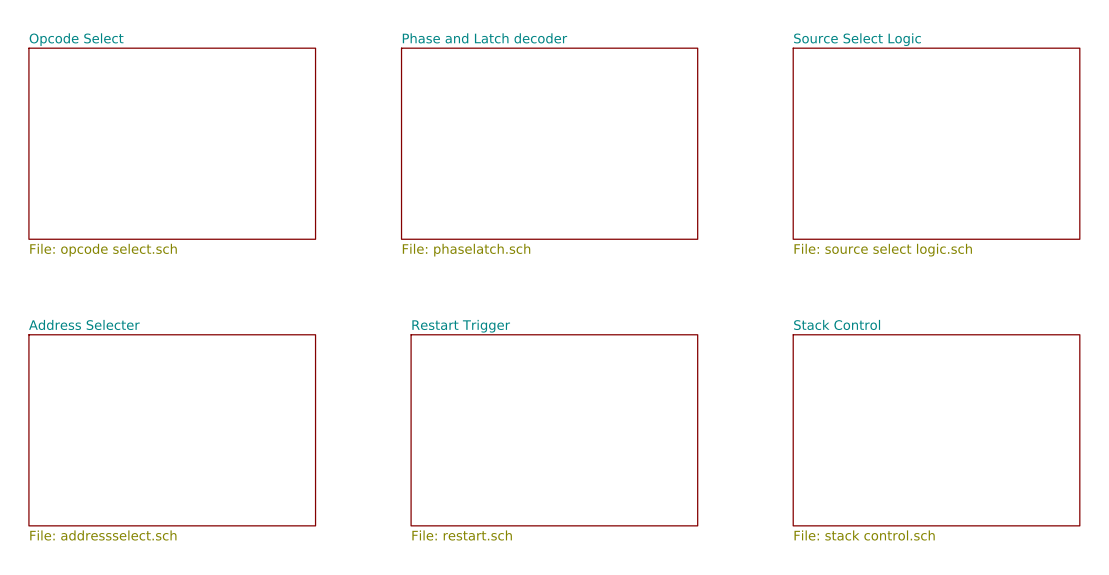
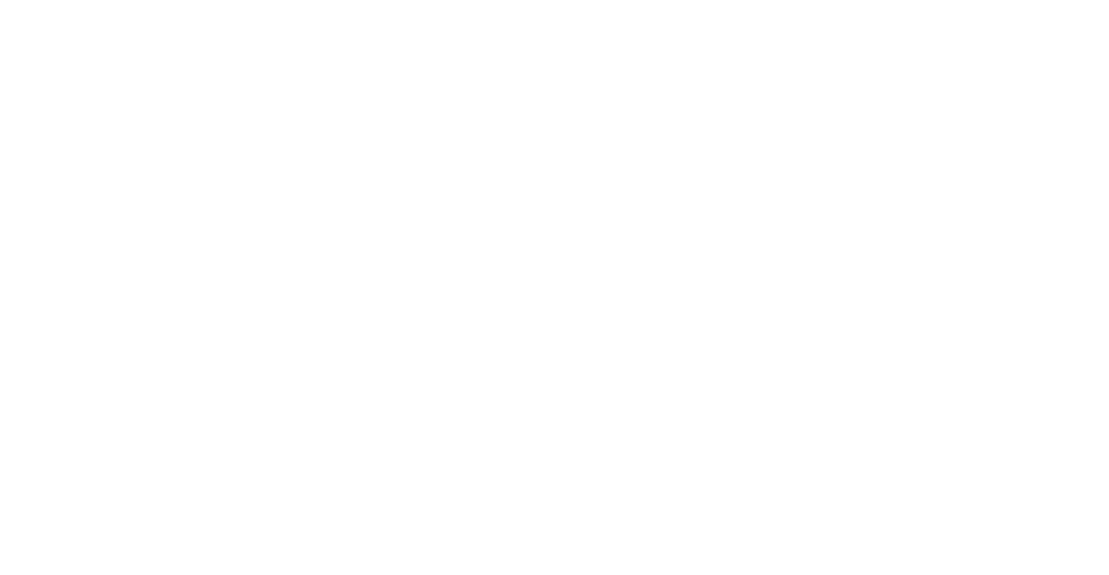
sheet Opcode Select: File: opcode select.sch (172, 143) -> none
sheet Phase and Latch decoder: File: phaselatch.sch (549, 143) -> none
sheet Source Select Logic: File: source select logic.sch (936, 143) -> none
sheet Address Selecter: File: addressselect.sch (172, 430) -> none
sheet Restart Trigger: File: restart.sch (554, 430) -> none
sheet Stack Control: File: stack control.sch (936, 430) -> none

